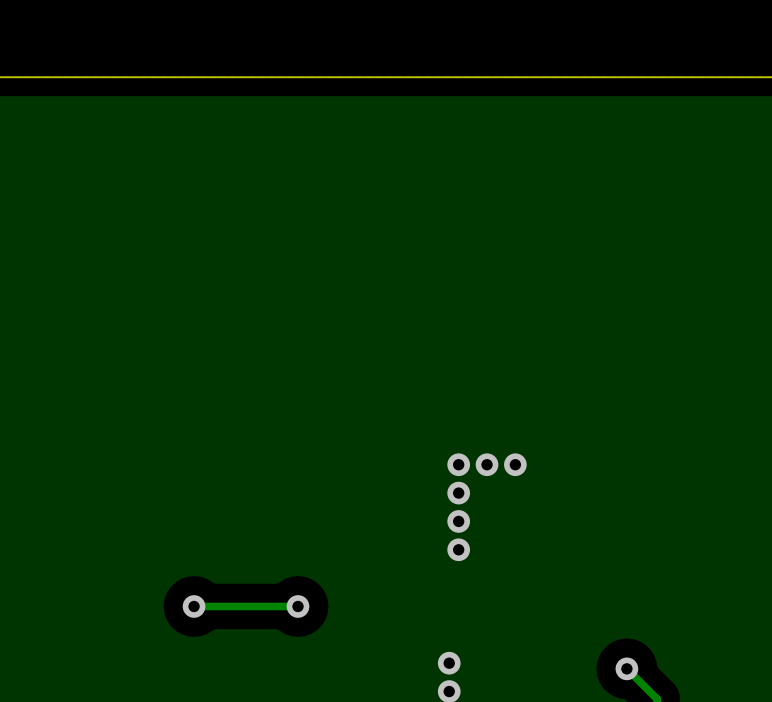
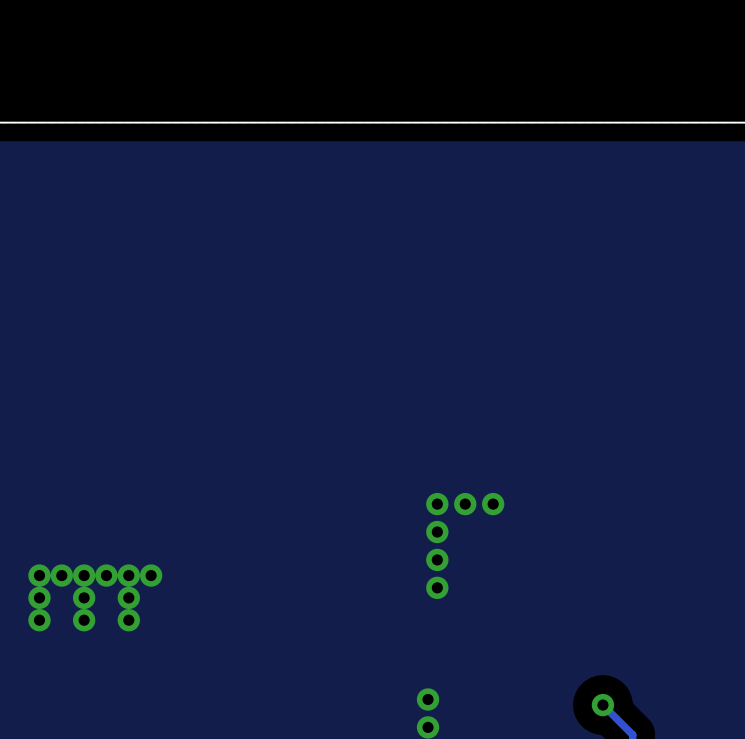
via: none -> (39, 575)
via: none -> (61, 575)
via: none -> (84, 575)
via: none -> (106, 575)
via: none -> (128, 575)
via: none -> (151, 575)
via: none -> (39, 597)
via: none -> (84, 597)
via: none -> (128, 597)
via: none -> (39, 620)
via: none -> (84, 620)
via: none -> (128, 620)
via: (194, 606) -> none
track: (298, 606) (194, 606) -> none
via: (298, 606) -> none

